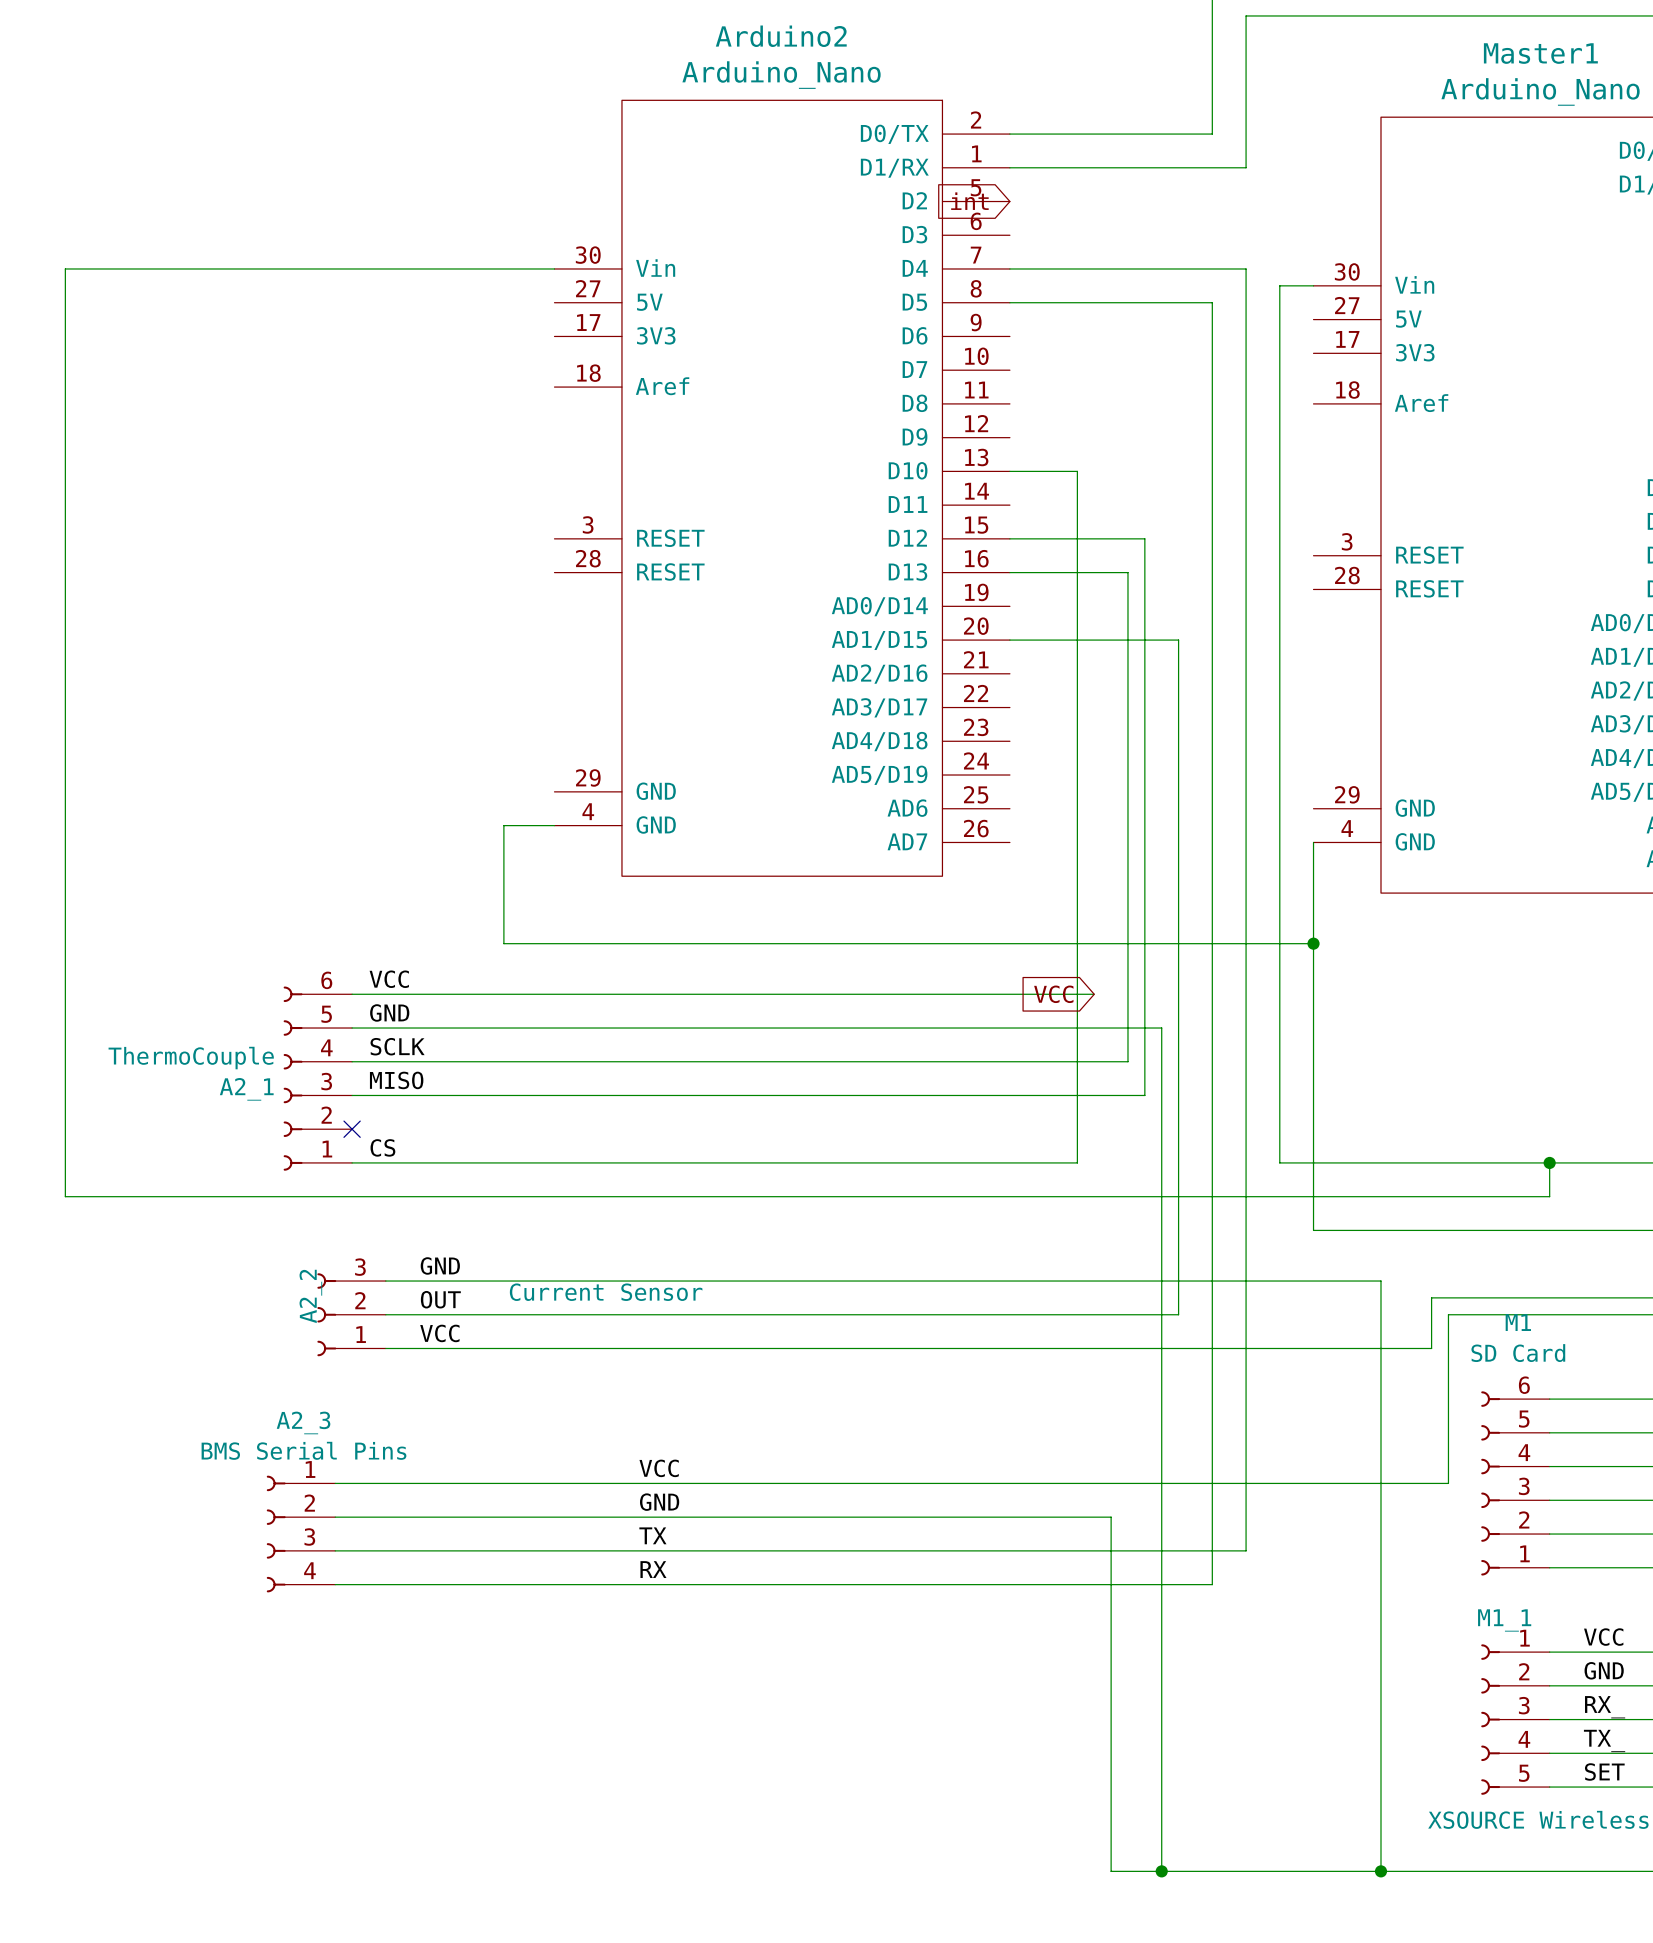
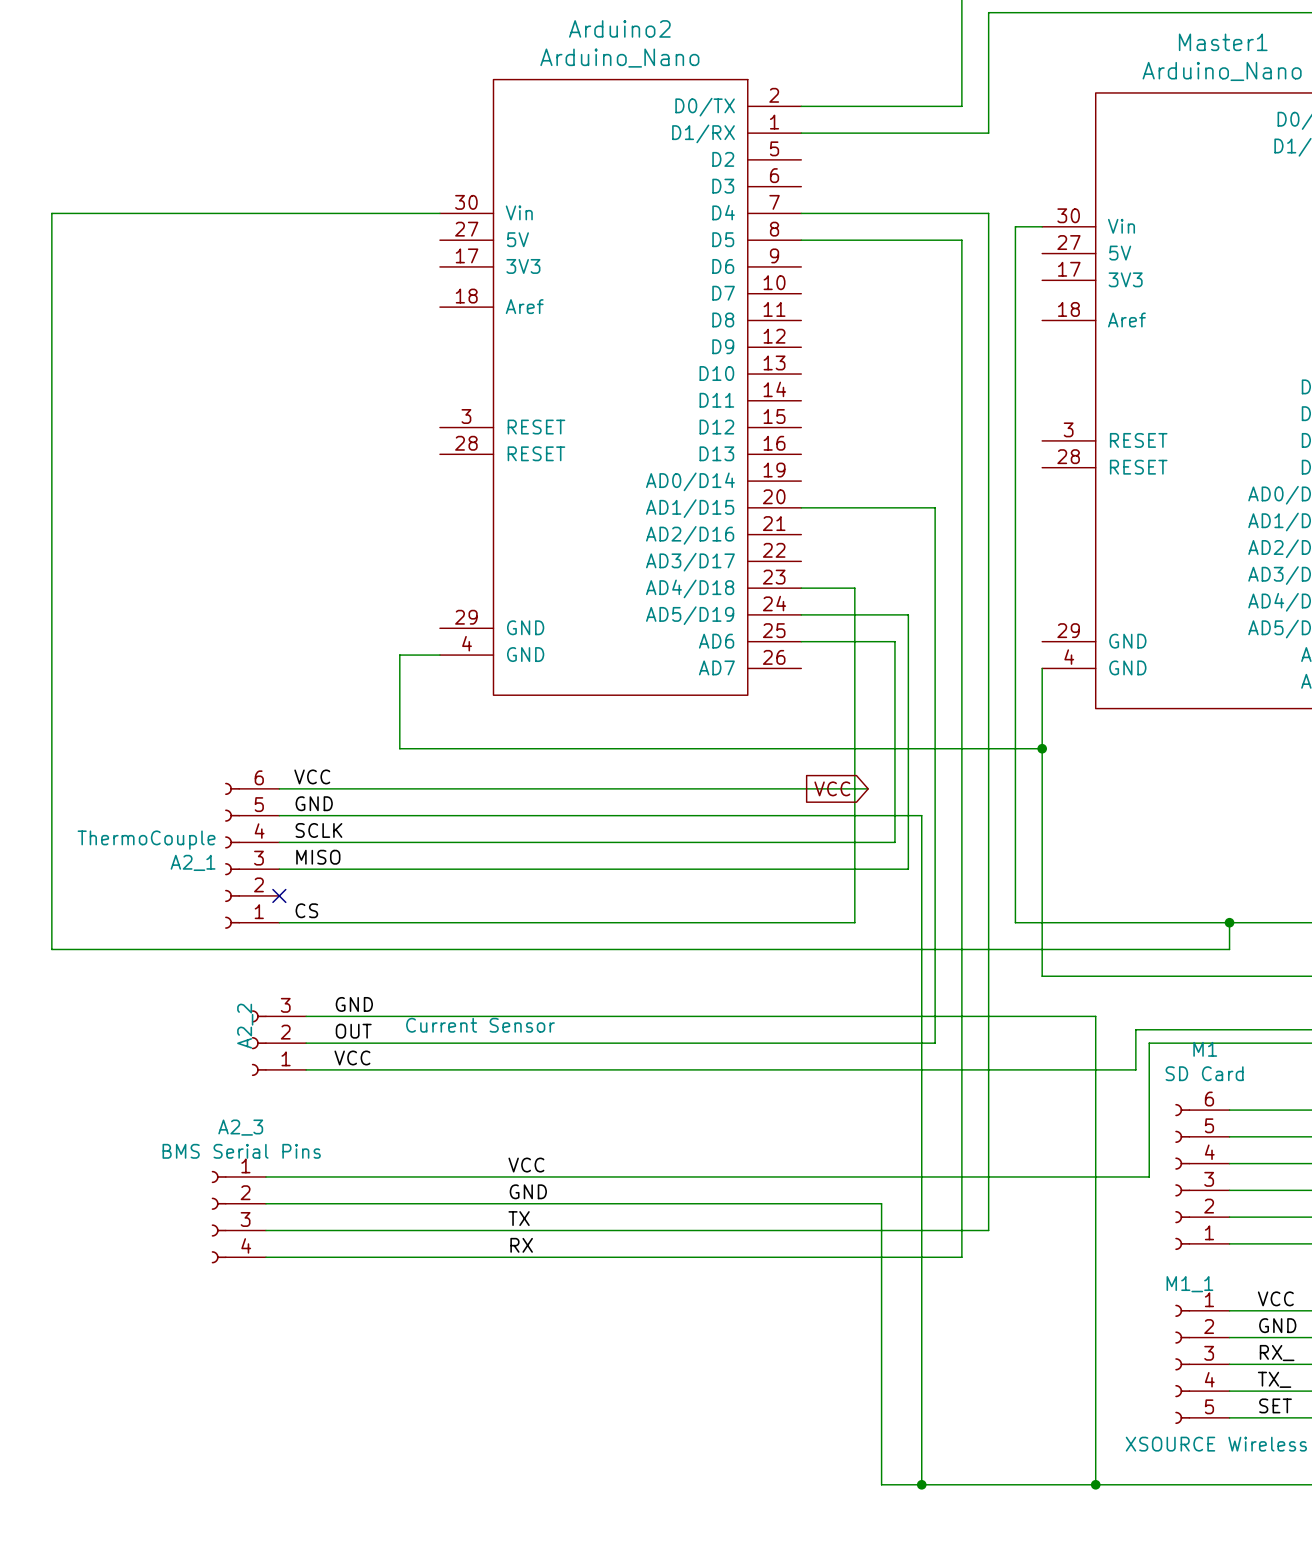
global label: int (969, 201) -> none
wire: (1009, 471) (1077, 471) (1077, 741) -> (801, 588) (854, 588)
wire: (1009, 538) (1144, 538) (1144, 775) -> (801, 614) (908, 614)
wire: (1009, 572) (1127, 572) (1127, 808) -> (801, 641) (894, 641)

